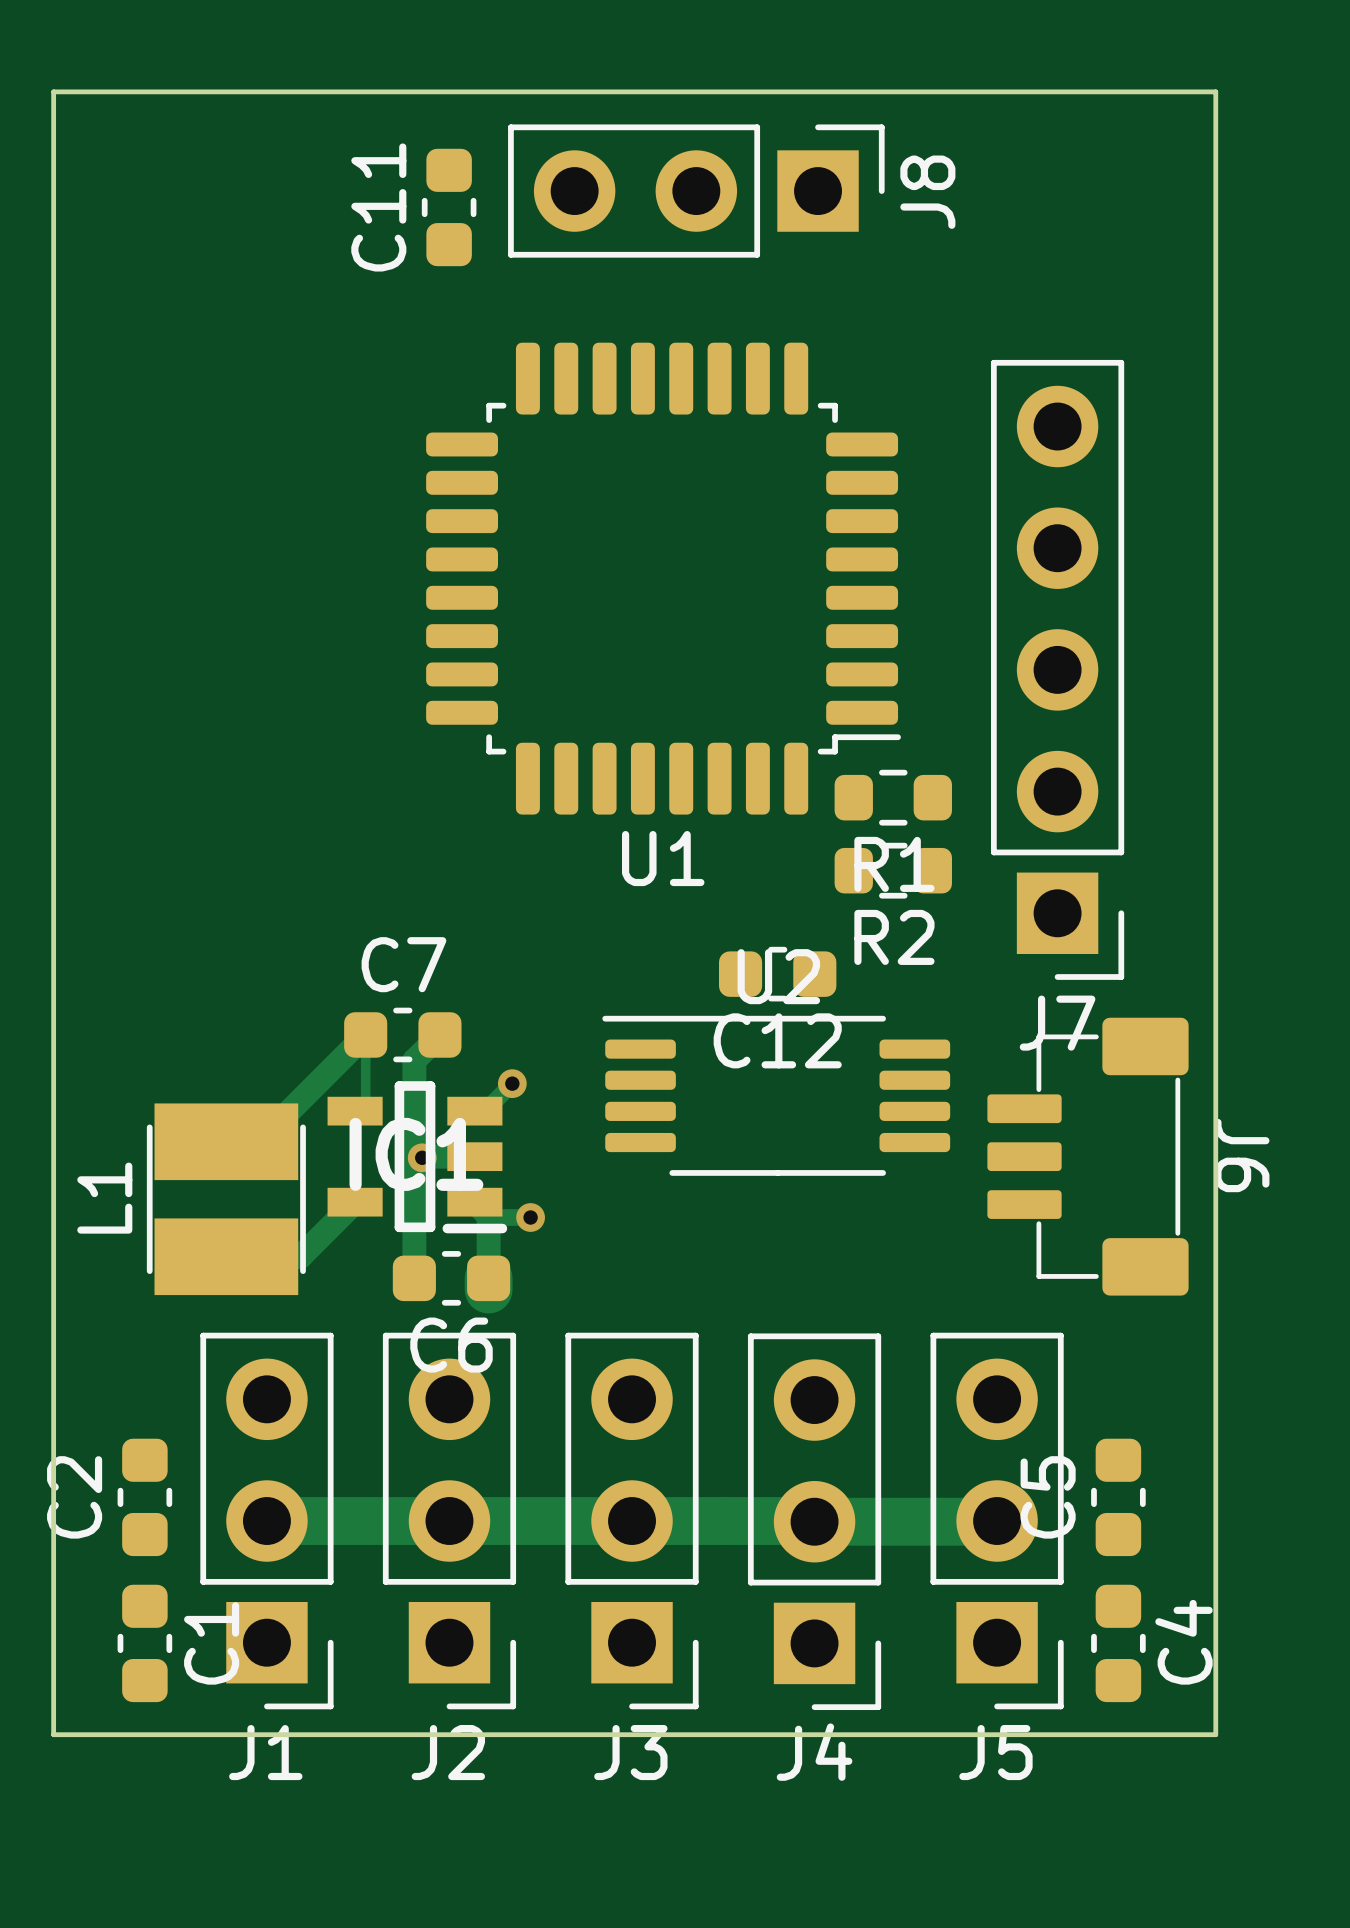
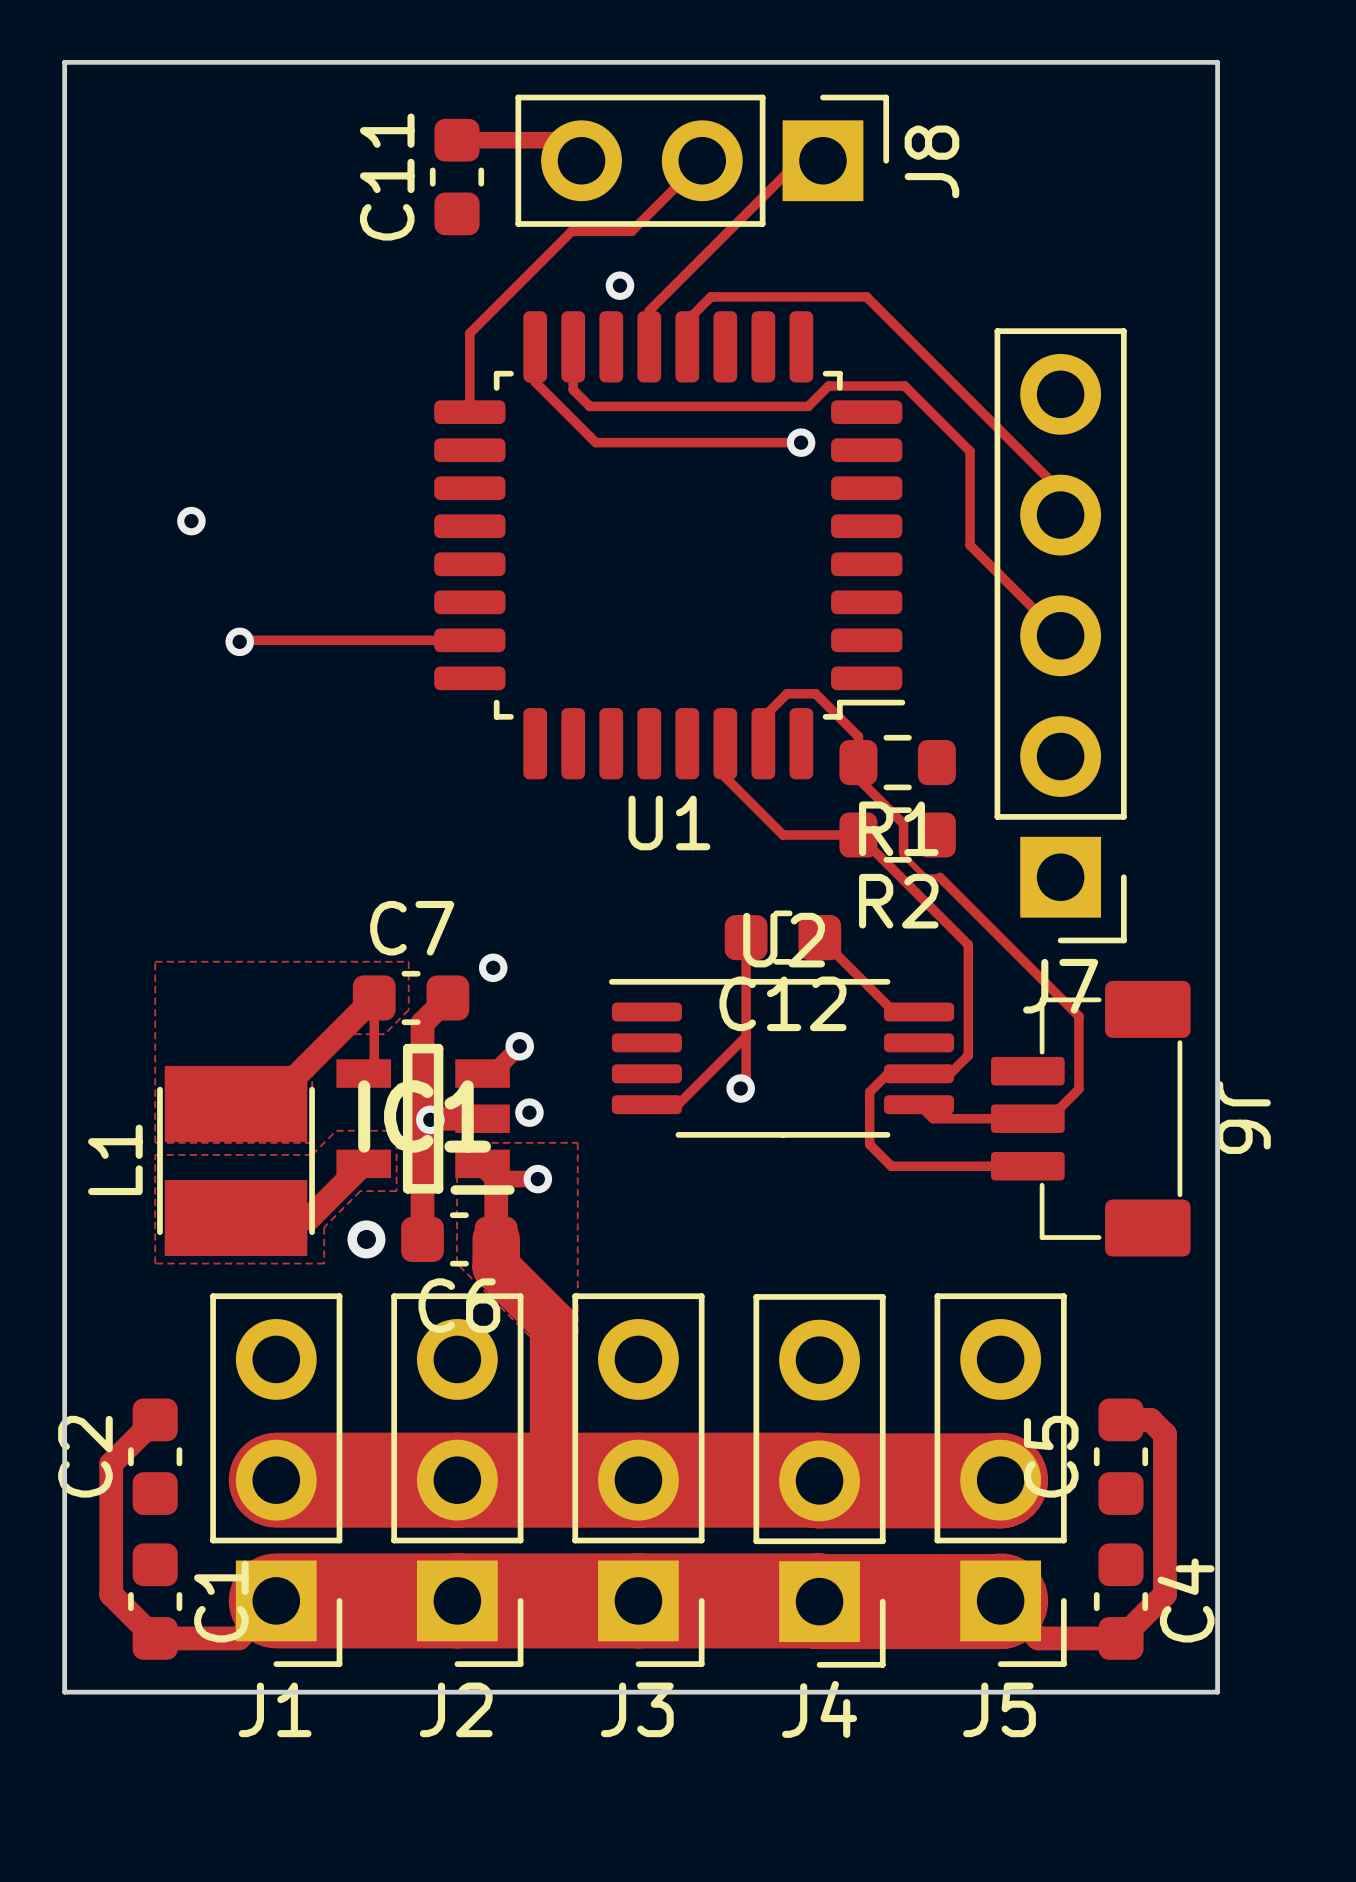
track: none -> (457, 140) (561, 140) (581, 160)
track: none -> (702, 160) (631, 231) (571, 231) (469, 333) (469, 412)
track: none -> (822, 160) (799, 160) (649, 310) (649, 346)
via: none -> (619, 285)
track: none -> (535, 346) (535, 381) (595, 442) (801, 442)
track: none -> (573, 346) (573, 389) (589, 406) (808, 406) (828, 386) (904, 386) (970, 451) (970, 545) (1060, 635)
track: none -> (687, 346) (687, 320) (711, 296) (866, 296) (1060, 490) (1060, 515)
via: none -> (801, 442)
via: none -> (191, 521)
track: none -> (469, 640) (241, 640) (239, 641)
via: none -> (239, 641)
track: none -> (725, 743) (725, 777) (782, 835) (858, 835) (968, 944) (968, 1055) (950, 1073) (887, 1073) (869, 1092) (869, 1144) (891, 1166) (1027, 1166)
track: none -> (763, 743) (763, 717) (787, 693) (815, 693) (858, 736) (858, 778) (903, 823) (903, 855) (925, 877) (939, 877) (1078, 1016) (1078, 1089) (1049, 1118) (933, 1118) (919, 1104)
track: none -> (746, 937) (746, 1083) (740, 1088)
track: none -> (819, 937) (894, 1012) (919, 1012)
zone outline: none -> (155, 961) (155, 1142) (312, 1142) (312, 1058) (336, 1034) (384, 1034) (408, 1010) (408, 961) (155, 961)
via: none -> (493, 967)
track: none -> (746, 1036) (677, 1104) (646, 1104)
via: none -> (740, 1088)
via: none -> (529, 1112)
zone outline: none -> (336, 1130) (312, 1154) (155, 1154) (155, 1263) (324, 1263) (324, 1227) (360, 1191) (396, 1191) (396, 1130) (336, 1130)
zone outline: none -> (457, 1142) (577, 1142) (577, 1336) (529, 1336) (457, 1263) (457, 1142)
via: none -> (366, 1239)
track: none -> (496, 1250) (496, 1267) (553, 1324) (553, 1432)
track: none -> (155, 1419) (111, 1463) (111, 1594) (155, 1638) (238, 1638) (276, 1600) (1000, 1600) (1038, 1638) (1120, 1638) (1164, 1594) (1164, 1434) (1150, 1419) (1120, 1419)
track width: thin (266, 1521) (997, 1521) -> thick (276, 1480) (1000, 1480)

